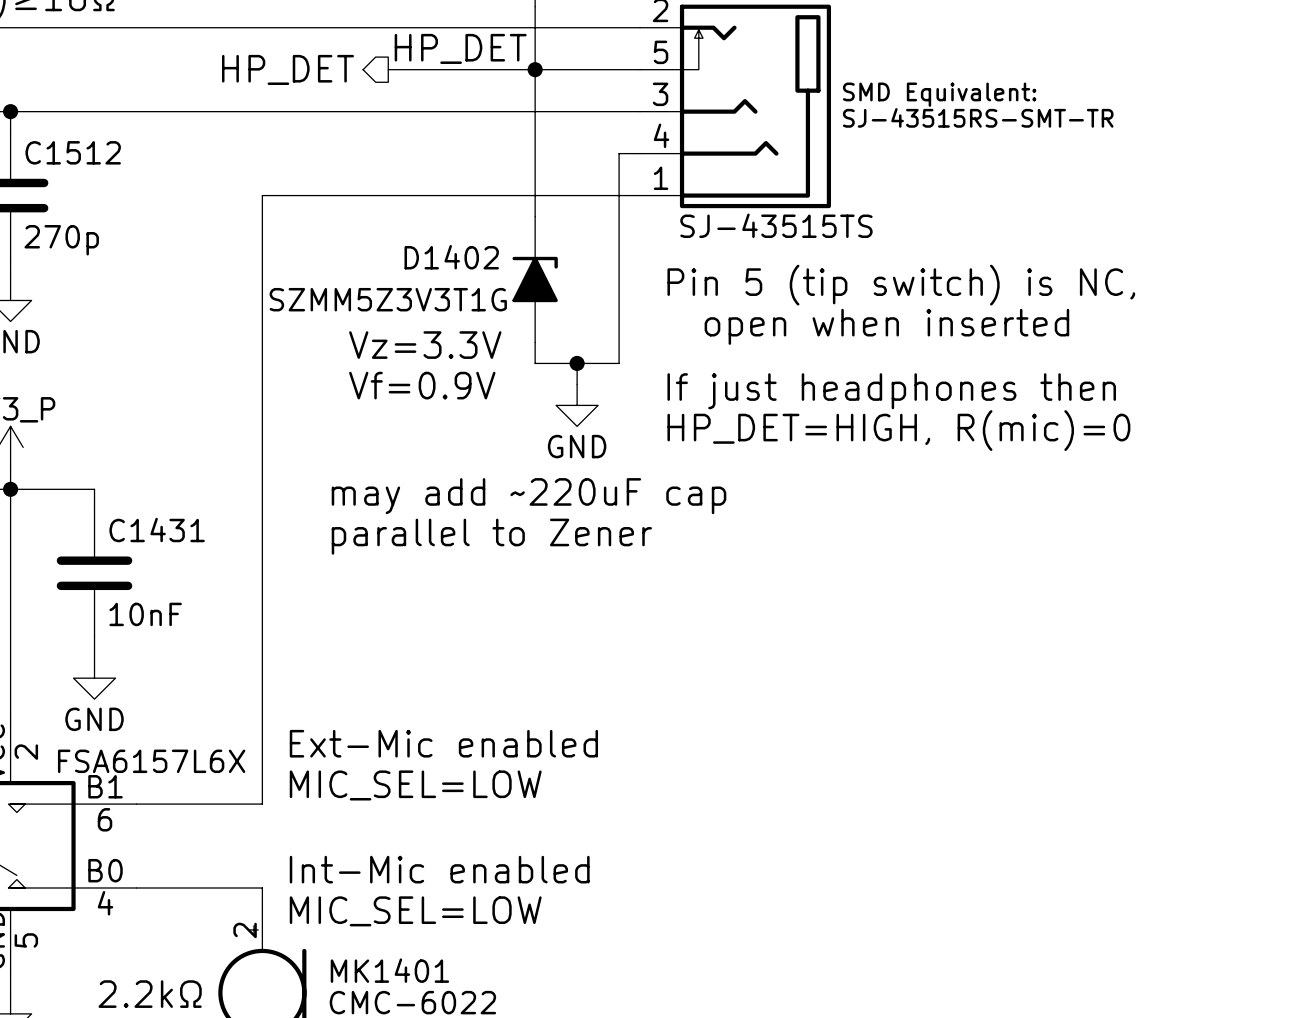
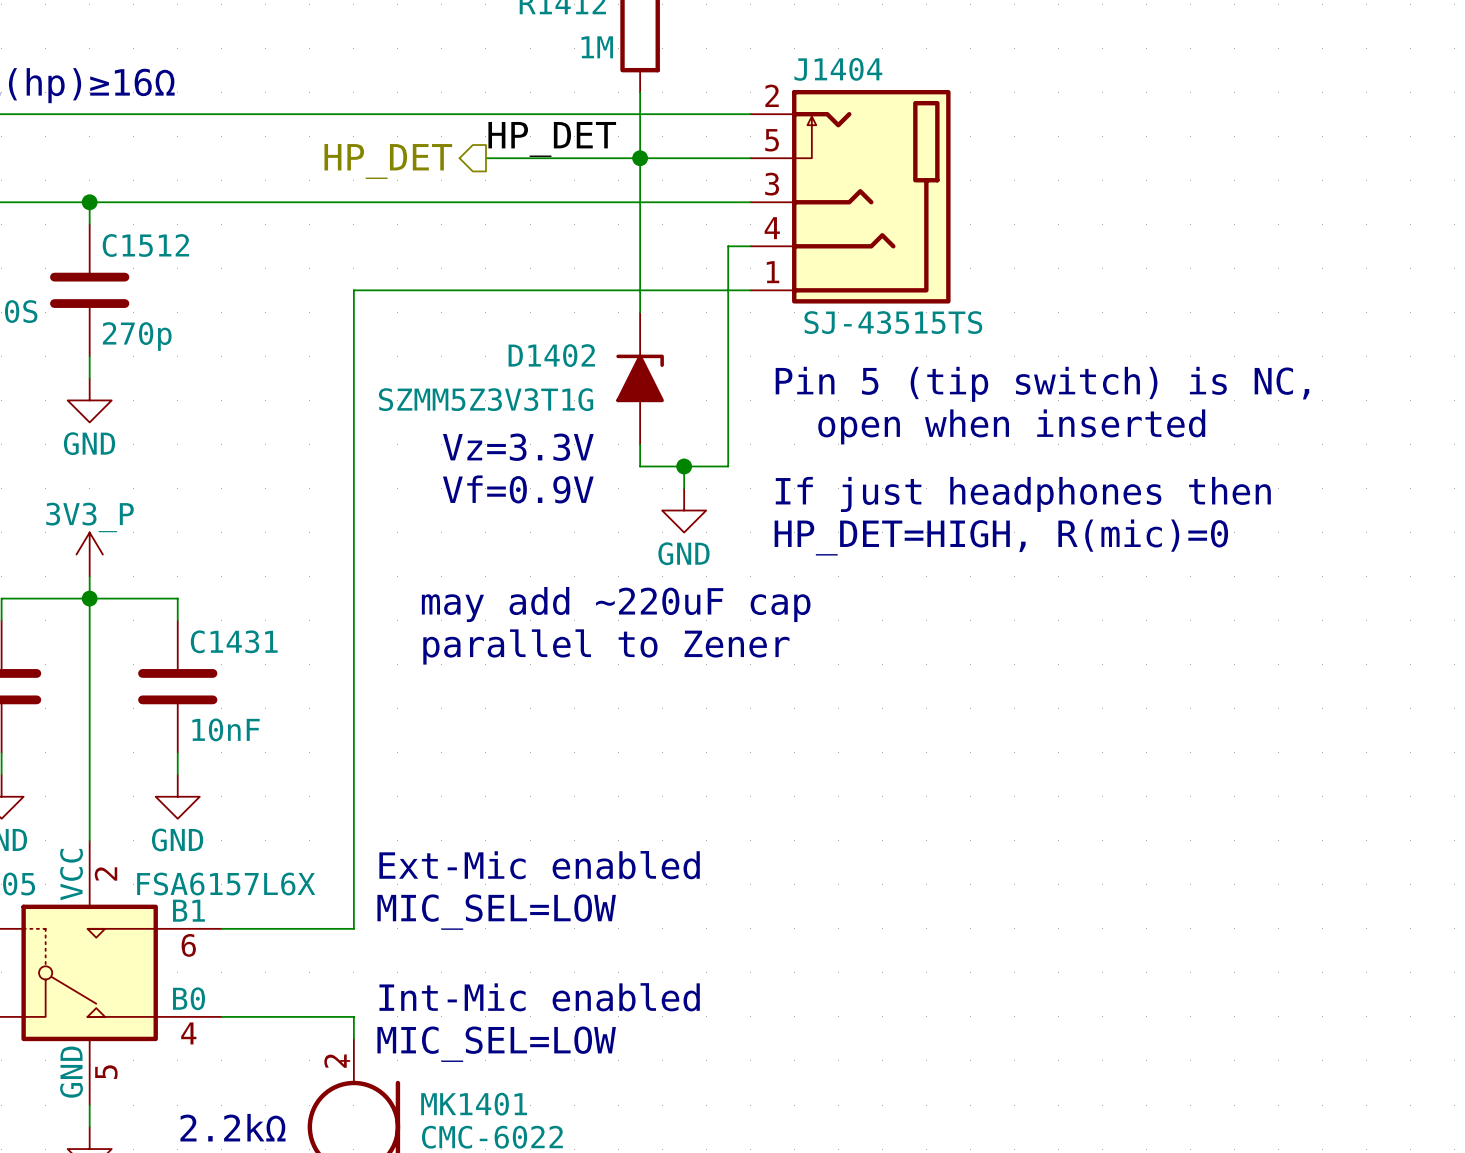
text: SMD Equivalent: (939, 94) -> none
text: SJ-43515RS-SMT-TR (978, 117) -> none

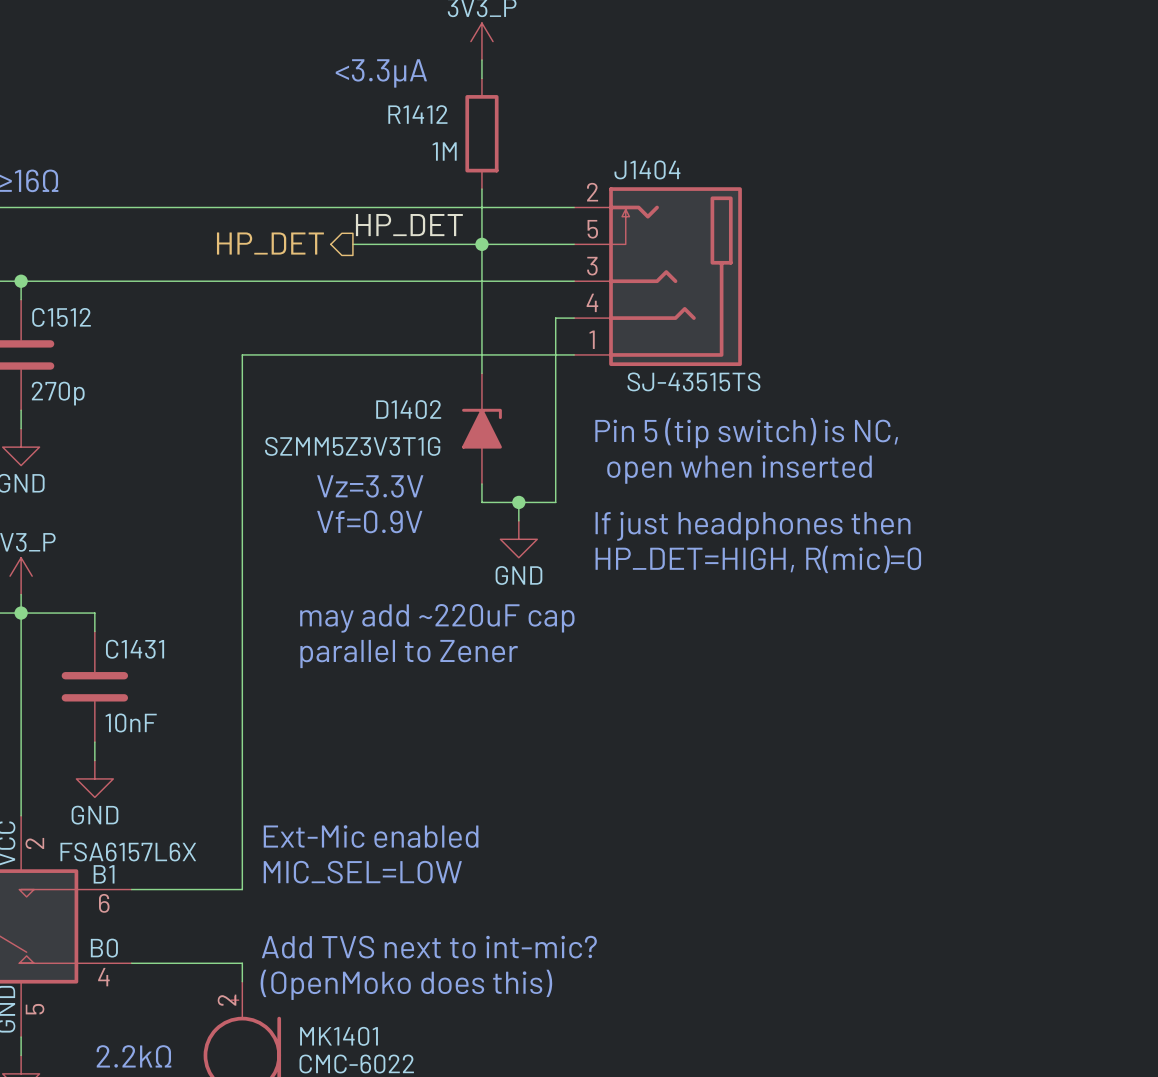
text: Int-Mic enabled (539, 997) -> Add TVS next to int-mic? (429, 947)
text: MIC_SEL=LOW (496, 1044) -> (OpenMoko does this) (406, 984)

